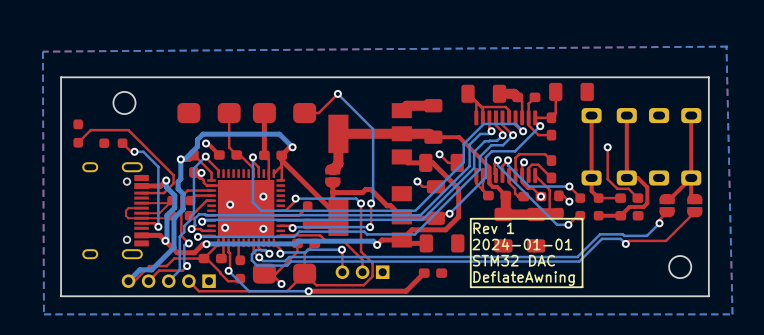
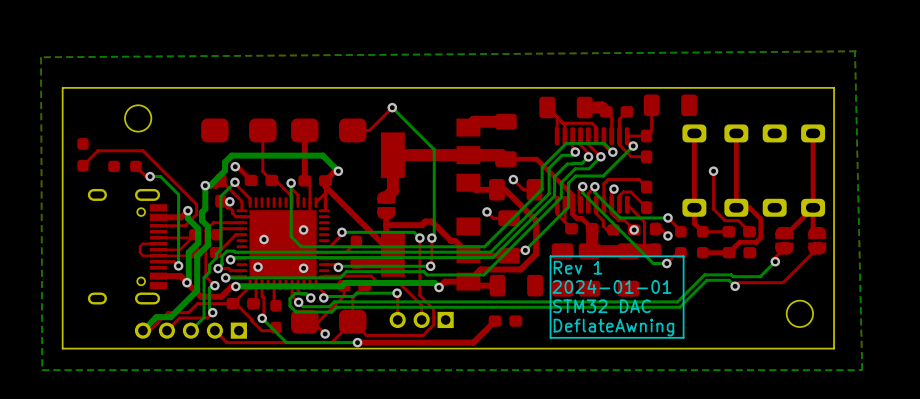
part: none -> (562, 269)

